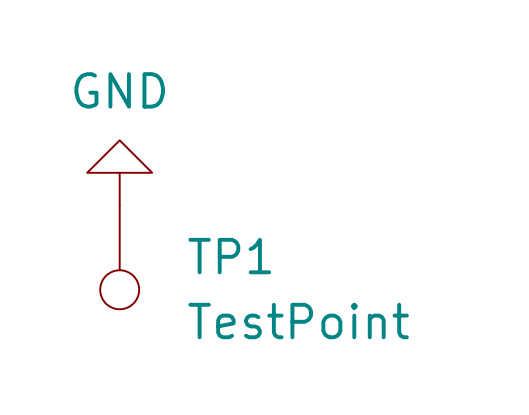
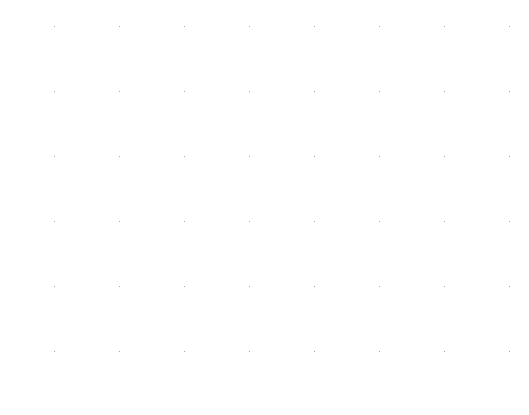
power symbol: GND (119, 172) -> none
TP1: TestPoint (119, 257) -> none

